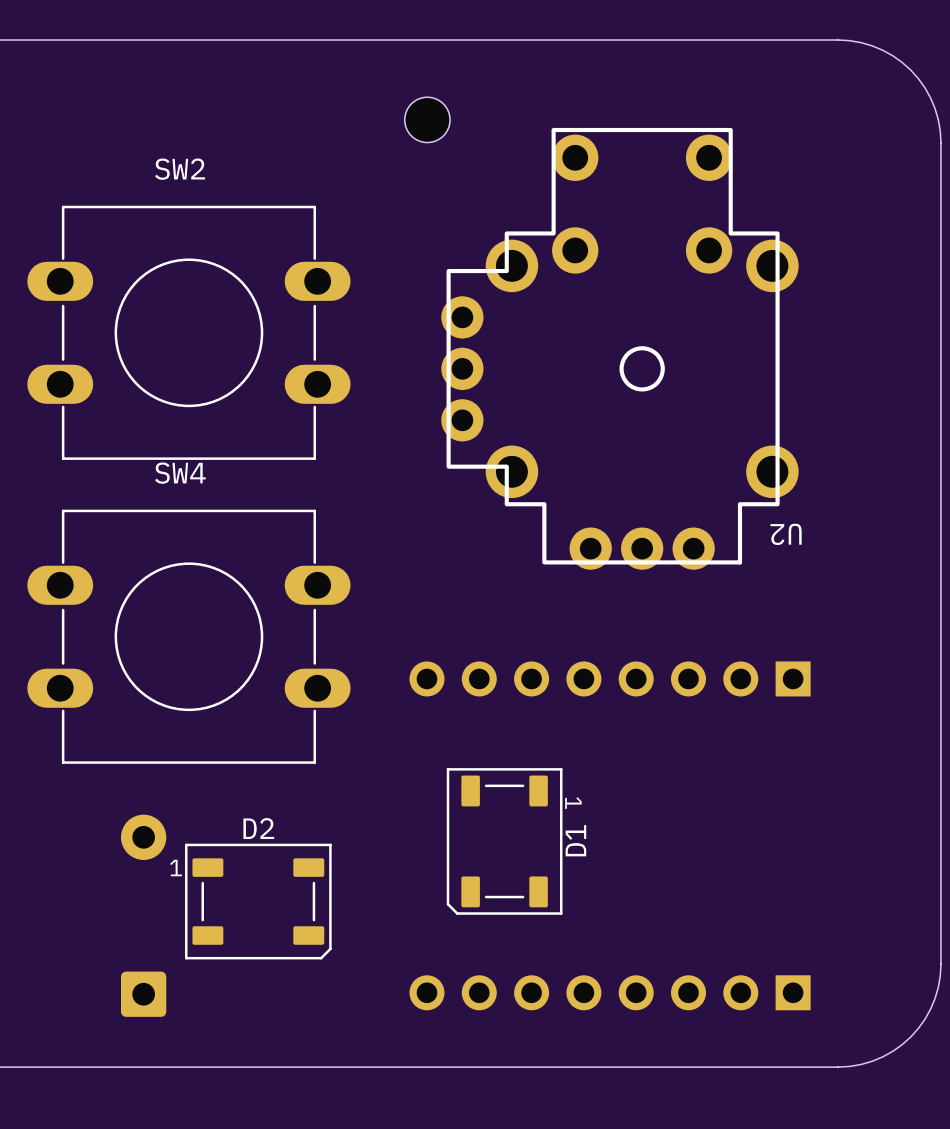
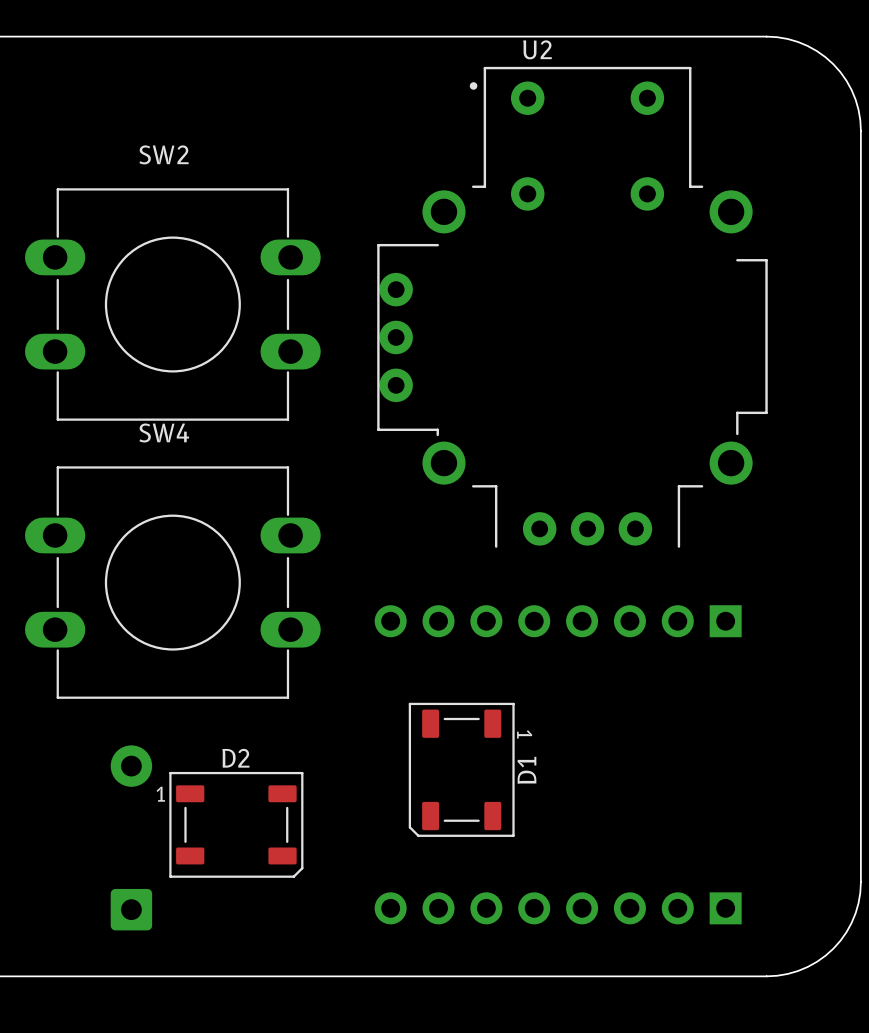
part: (427, 119) -> none
U2 footprint: [441, 127, 799, 570] -> [377, 66, 768, 548]
U2 name position: U2 (786, 534) -> U2 (537, 49)

